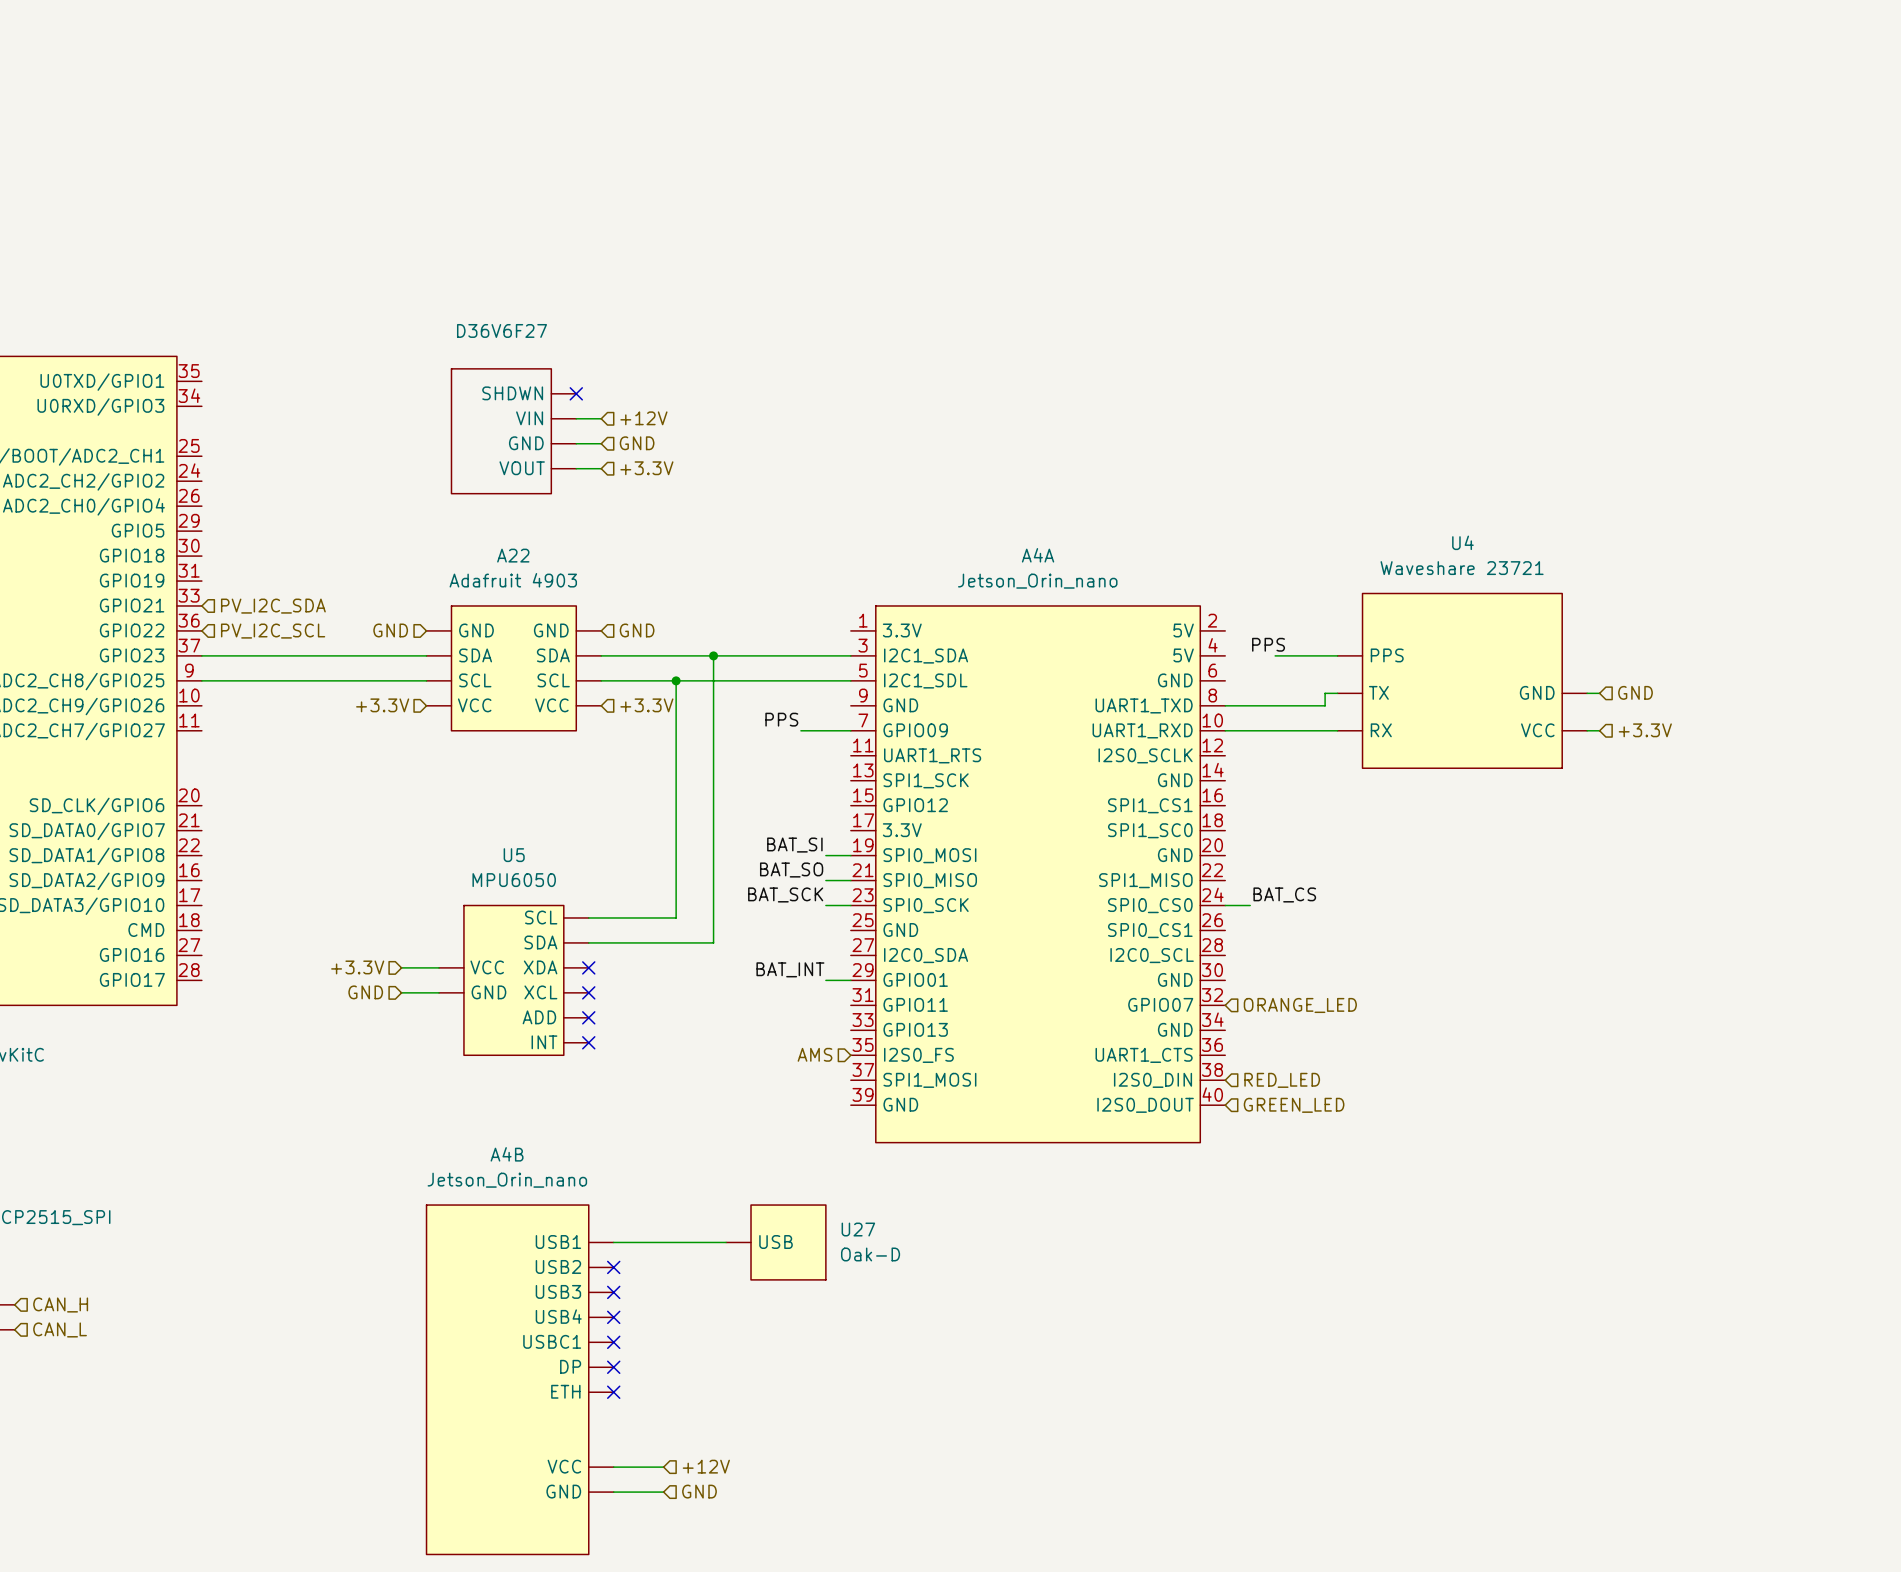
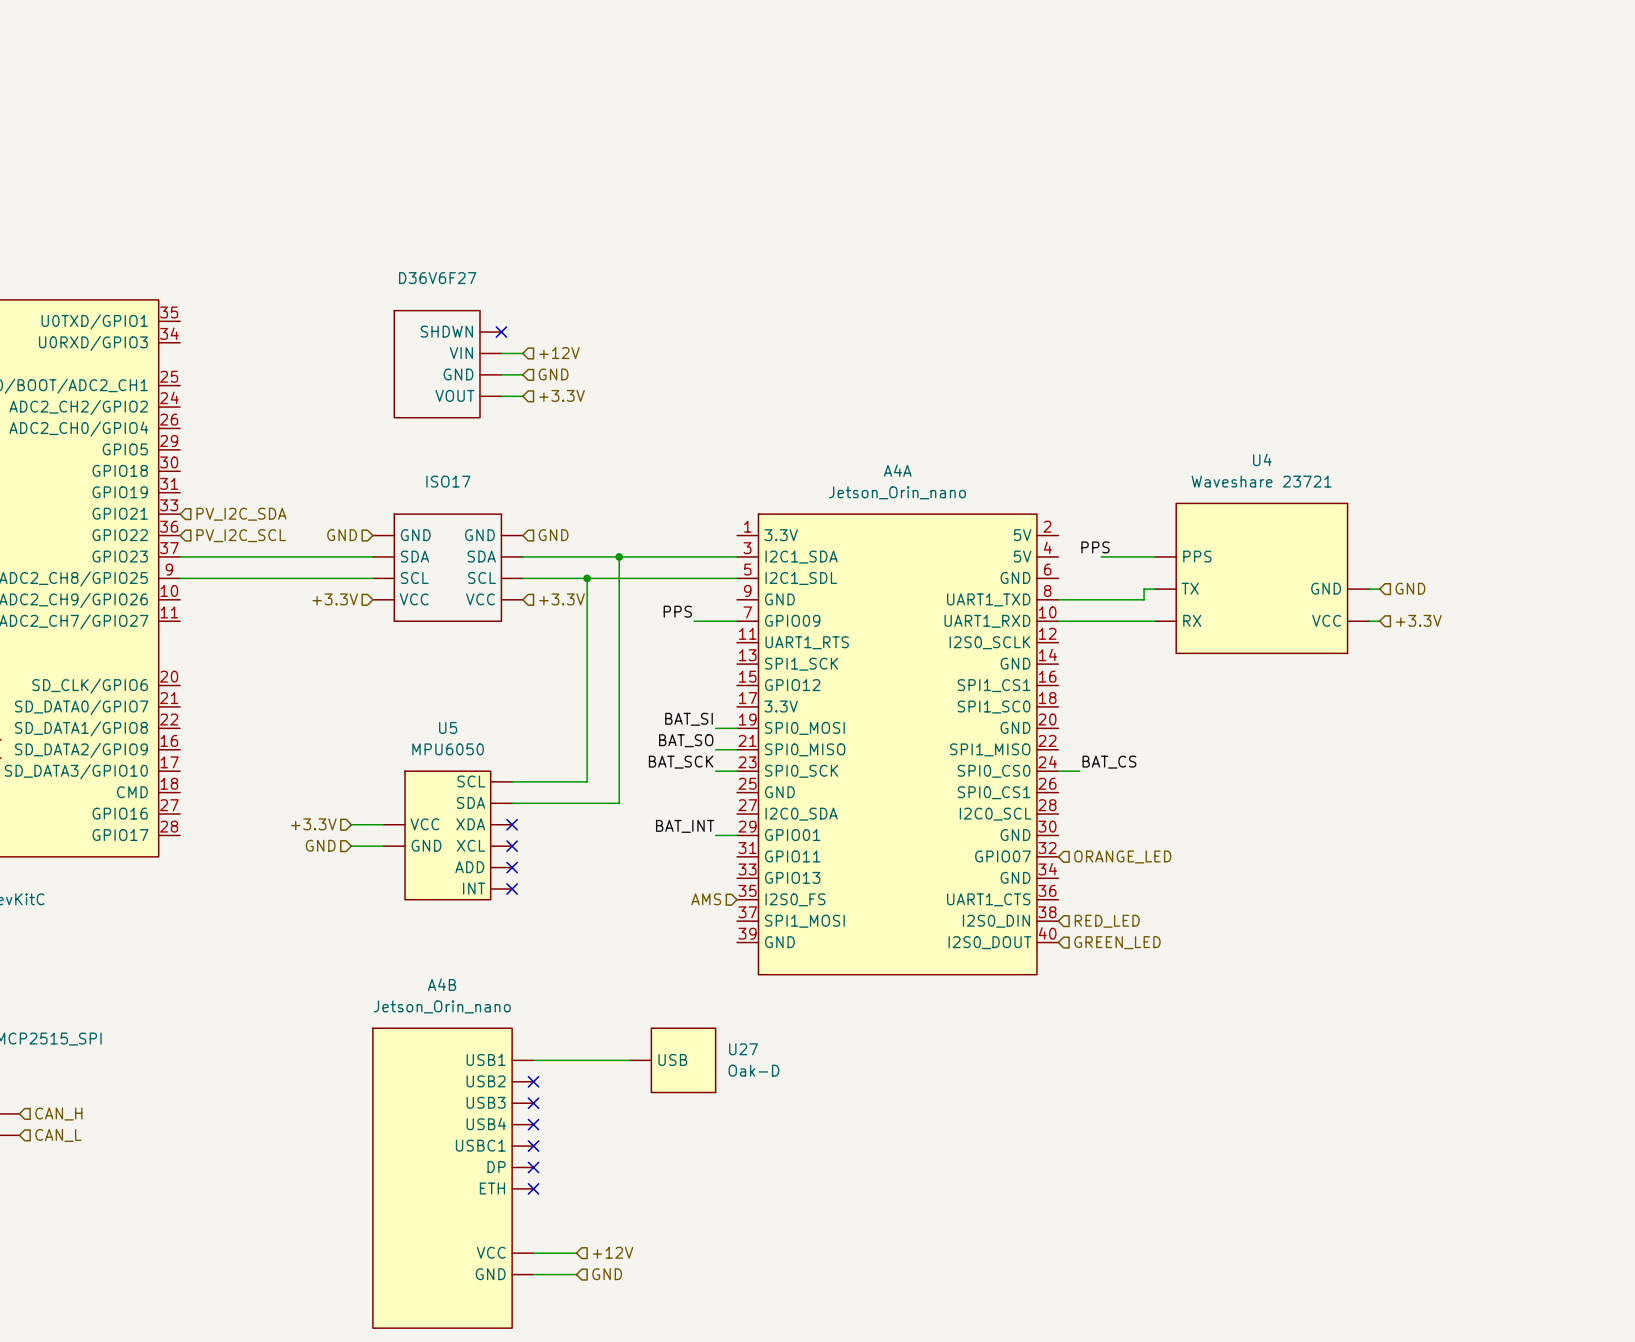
A22: Adafruit 4903 (513, 668) -> none
ISO17: none -> (447, 567)

